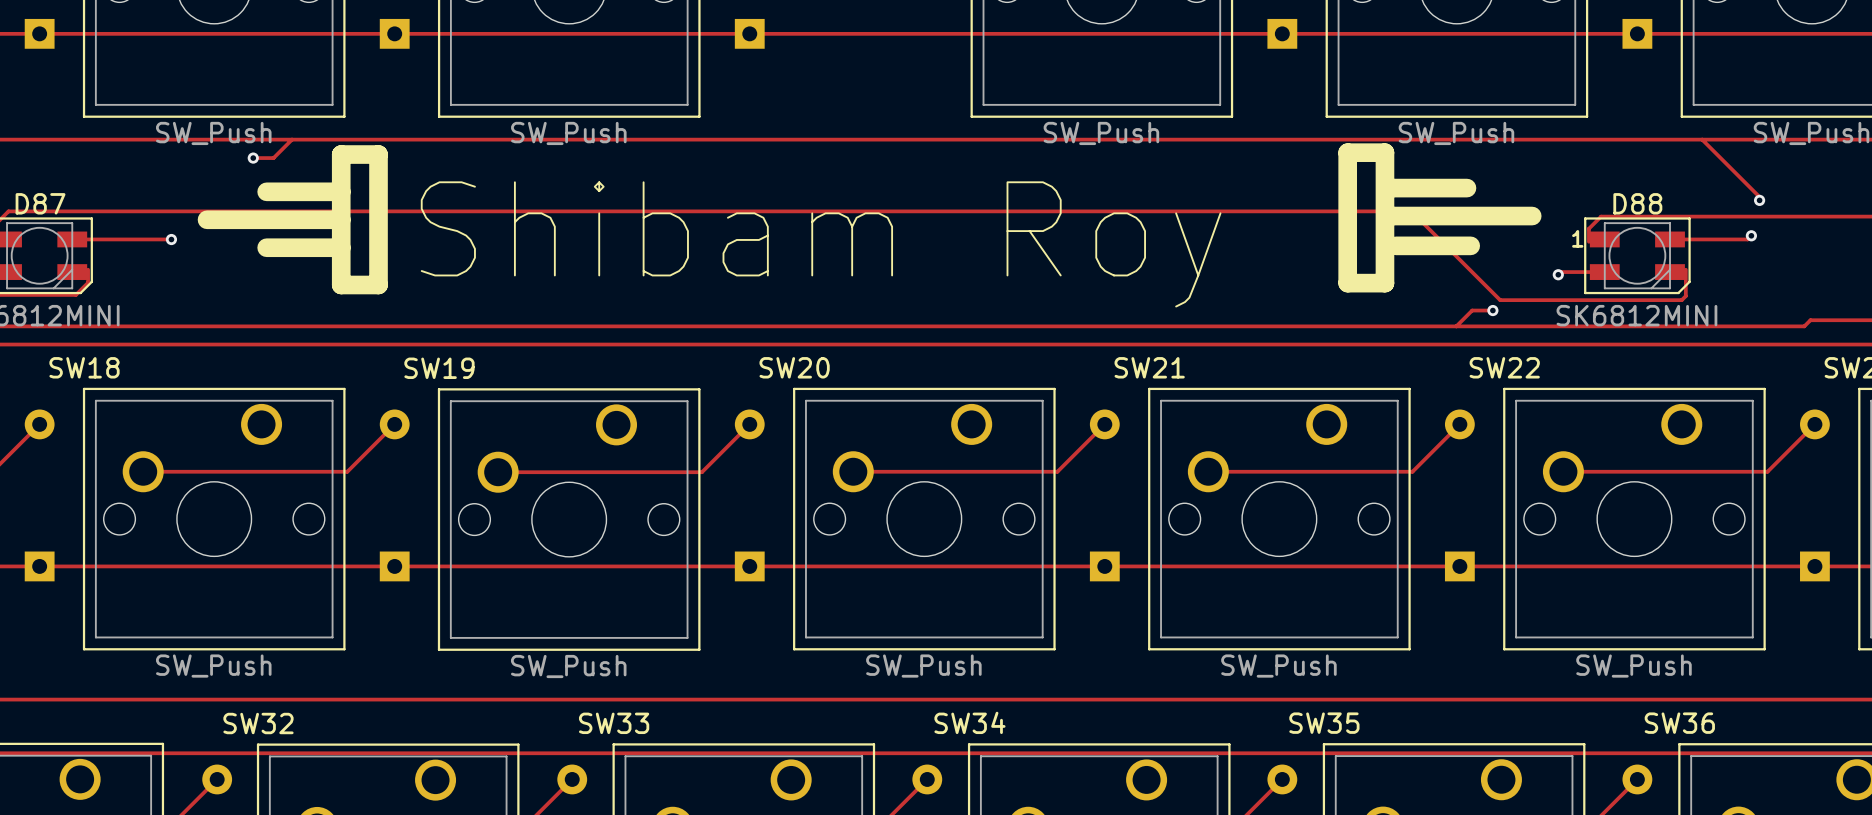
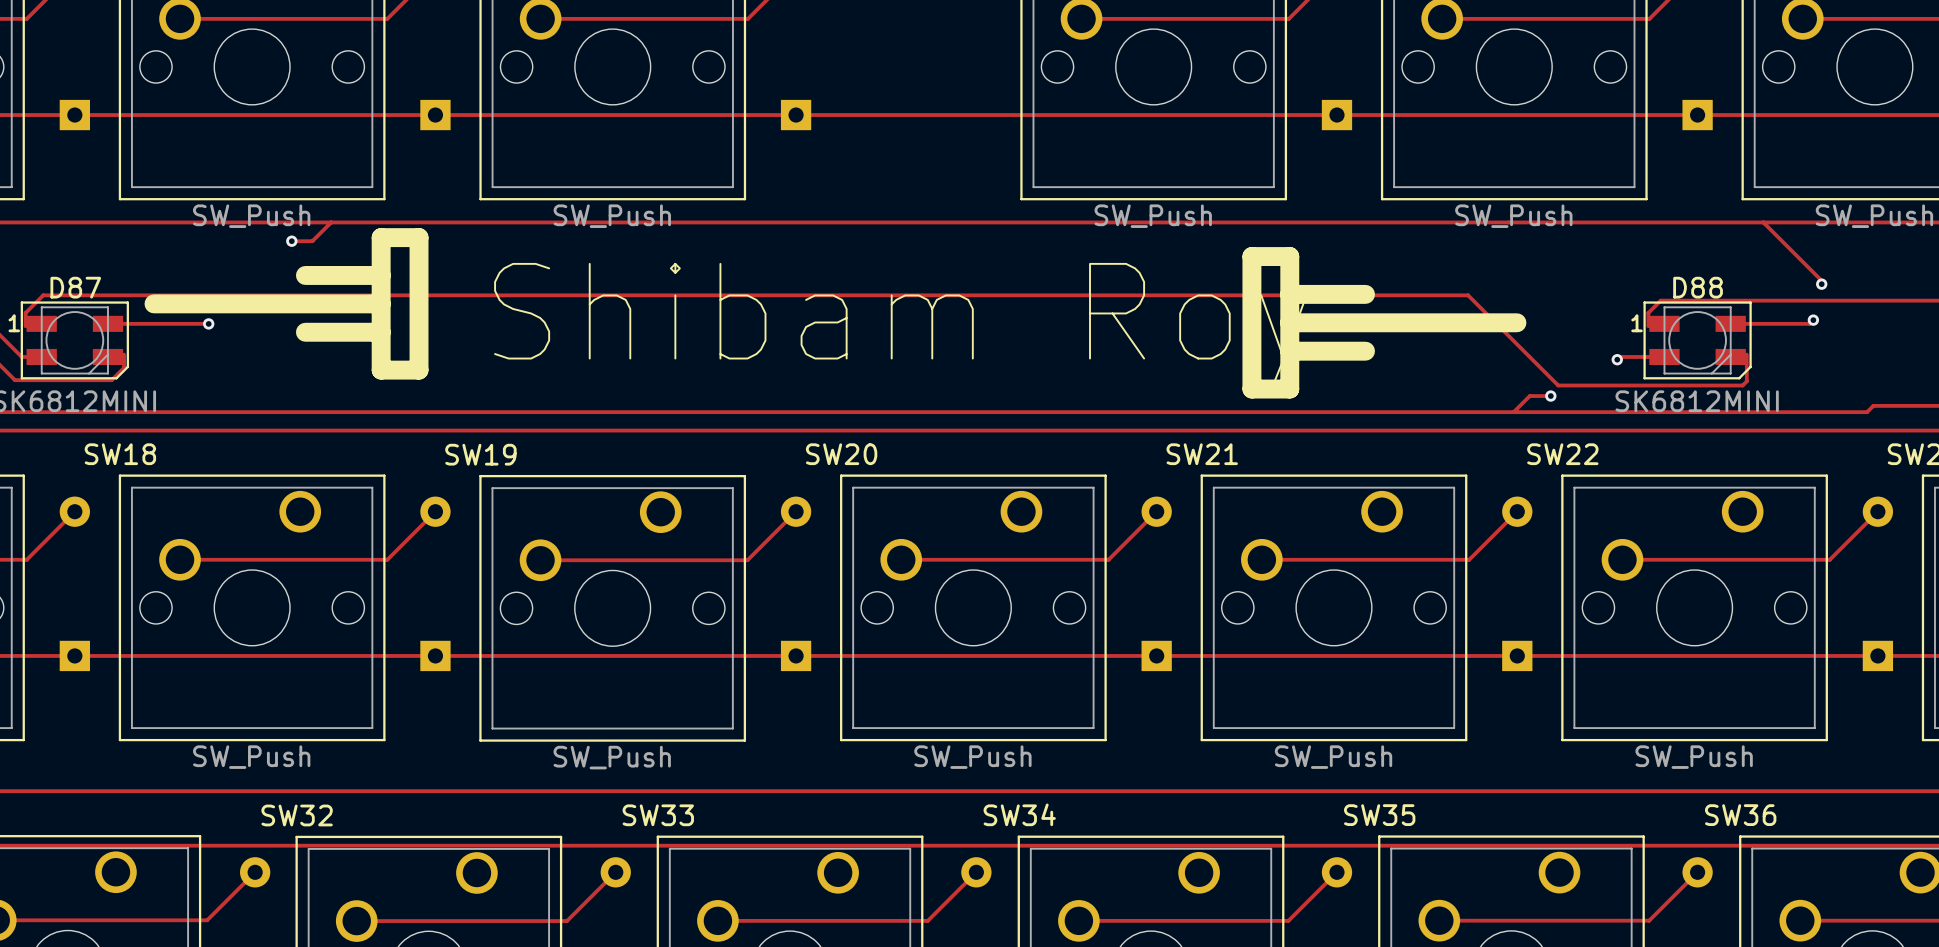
line: (1347, 152) (1384, 152) (1384, 283) (1347, 283) (1347, 152) -> (1251, 256) (1289, 256) (1289, 389) (1251, 389) (1251, 256)
line: (1392, 188) (1466, 188) -> (1289, 294) (1365, 294)
line: (1386, 216) (1532, 216) -> none
line: none -> (154, 303) (244, 303)
line: none -> (1289, 322) (1516, 322)
text position: Shibam Roy (821, 244) -> Shibam Roy (900, 326)
line: (1396, 245) (1470, 245) -> (1289, 351) (1365, 351)

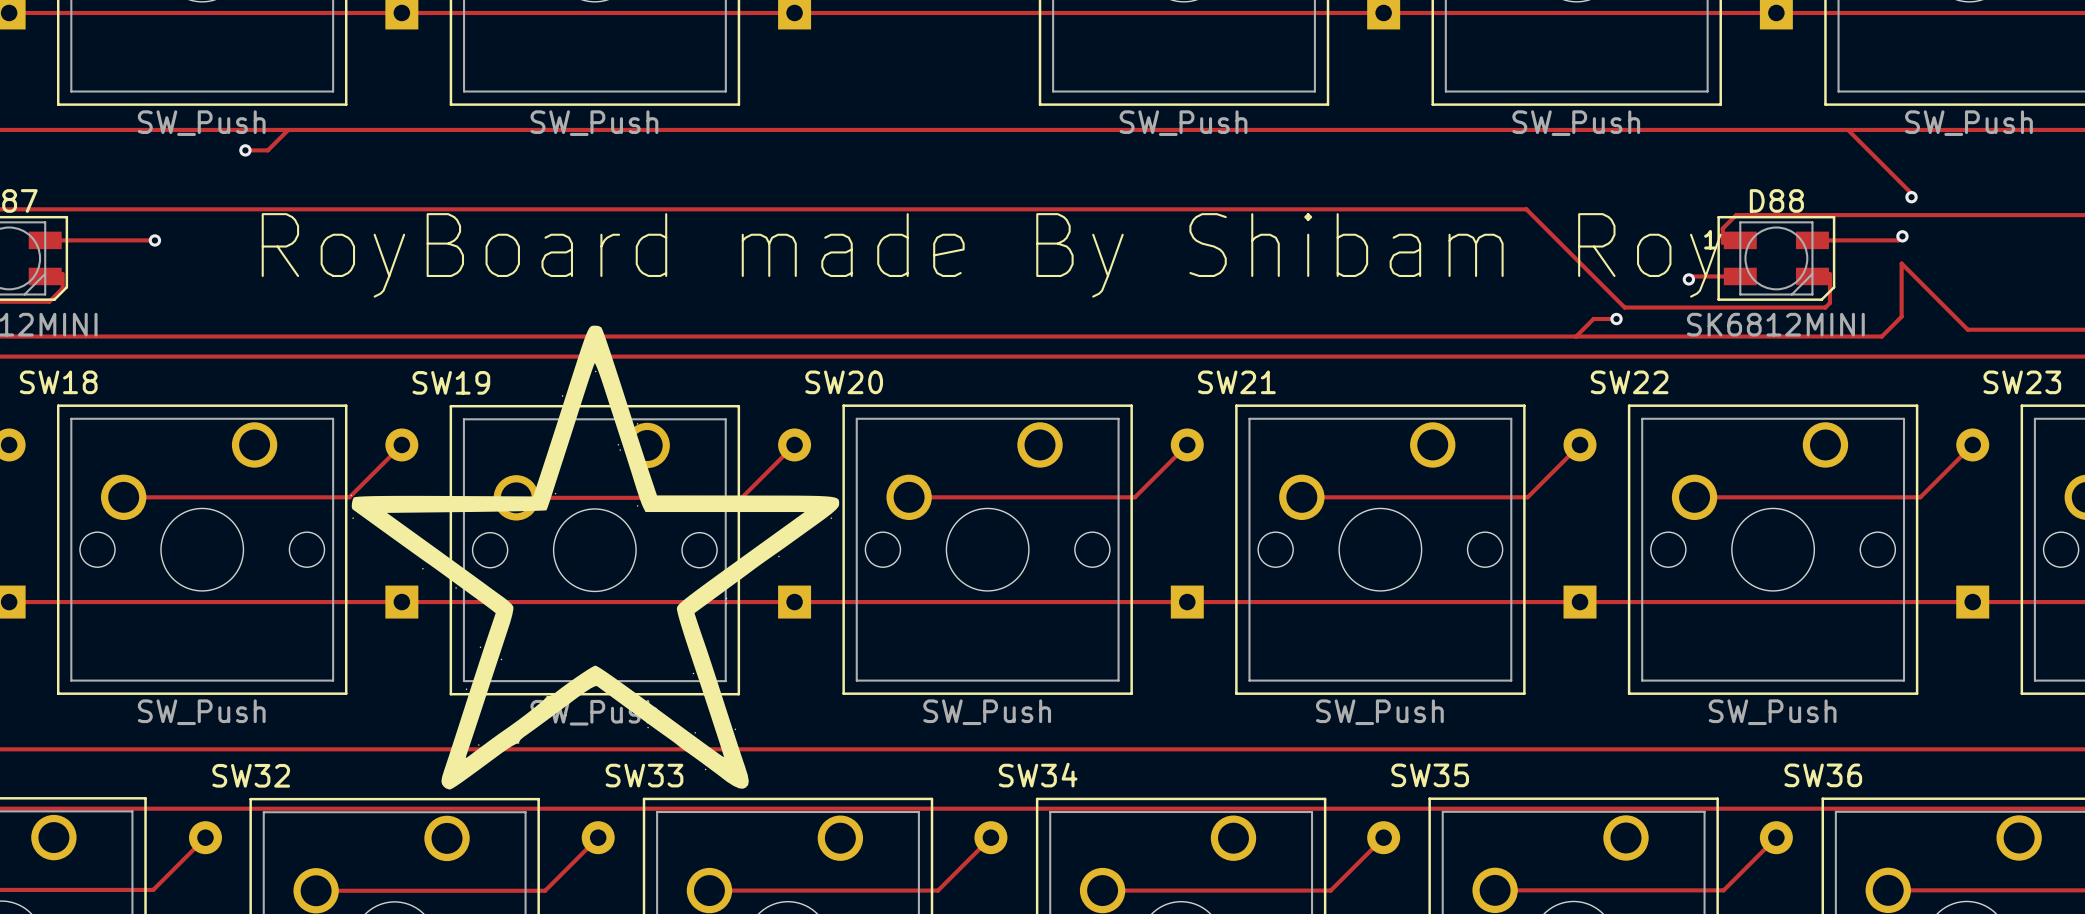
line: (381, 237) (419, 237) (419, 370) (381, 370) (381, 237) -> none
line: (1251, 256) (1289, 256) (1289, 389) (1251, 389) (1251, 256) -> none
line: (305, 275) (381, 275) -> none
line: (1289, 294) (1365, 294) -> none
line: (154, 303) (381, 303) -> none
line: (1289, 322) (1516, 322) -> none
text: Shibam Roy (900, 326) -> none
line: (305, 332) (381, 332) -> none
text: none -> RoyBoard made By Shibam Roy (991, 255)
line: (1289, 351) (1365, 351) -> none
drawing: none -> [350, 325, 840, 790]
track: (1873, 405) (1867, 412) (1794, 412) -> (1967, 329) (1901, 263) (1901, 316) (1881, 336)

